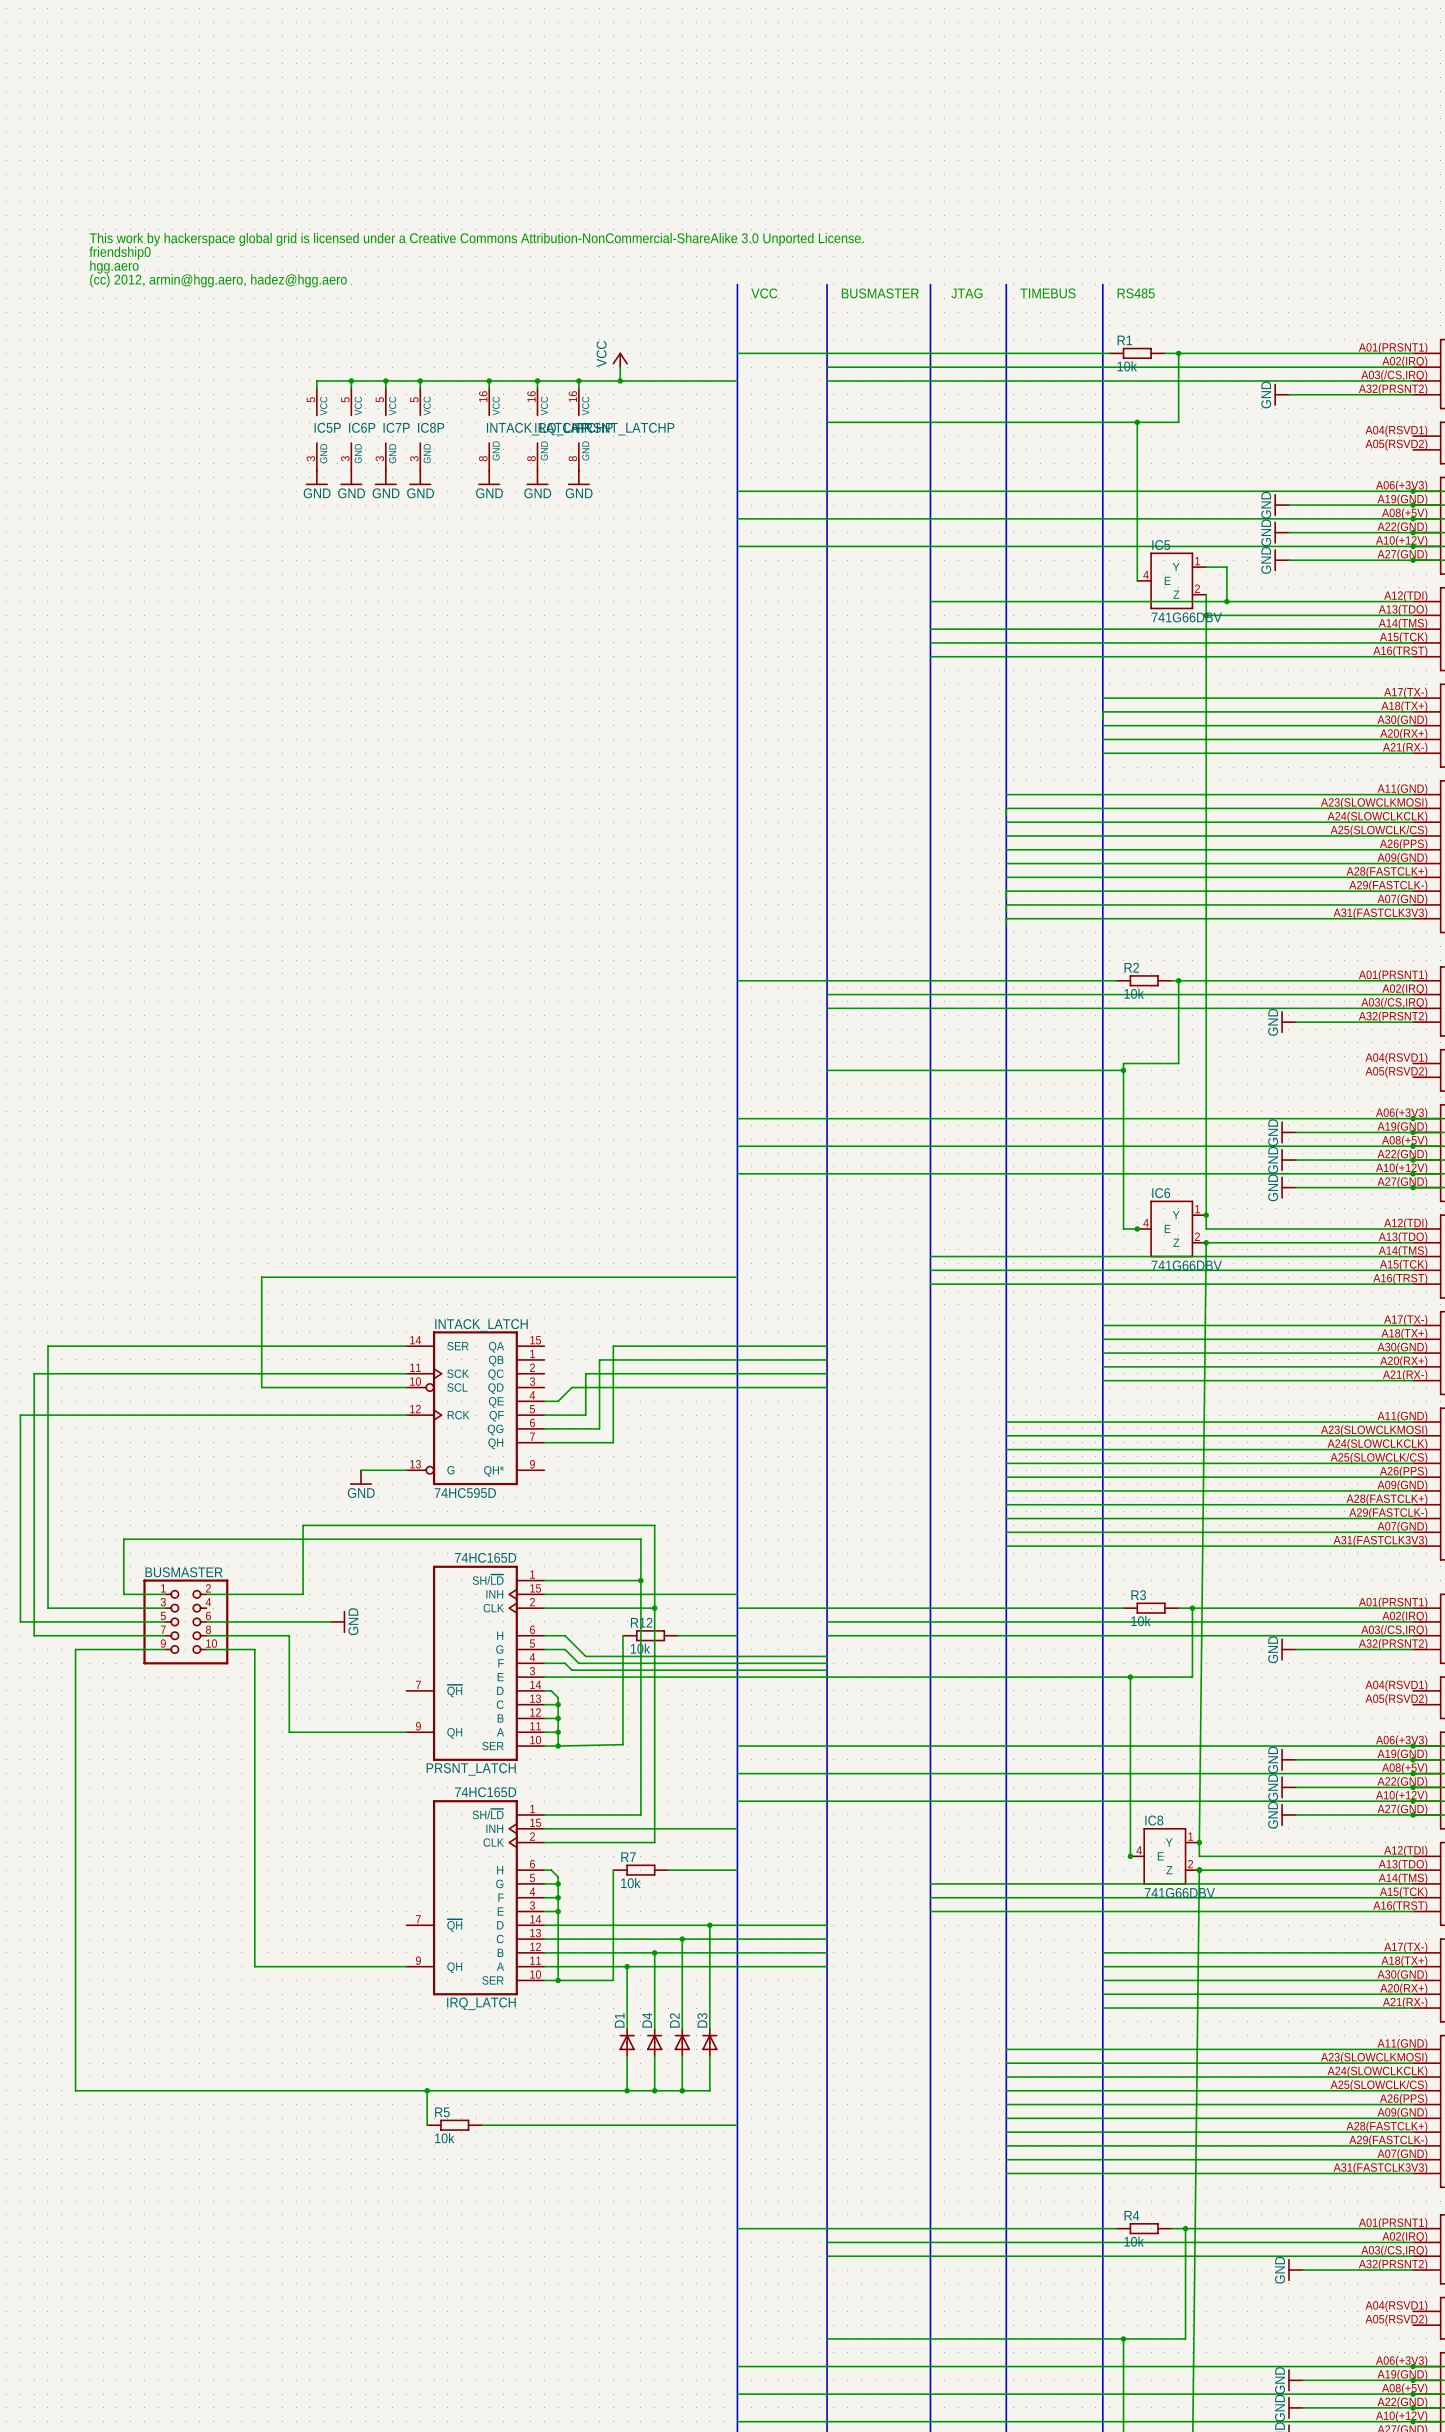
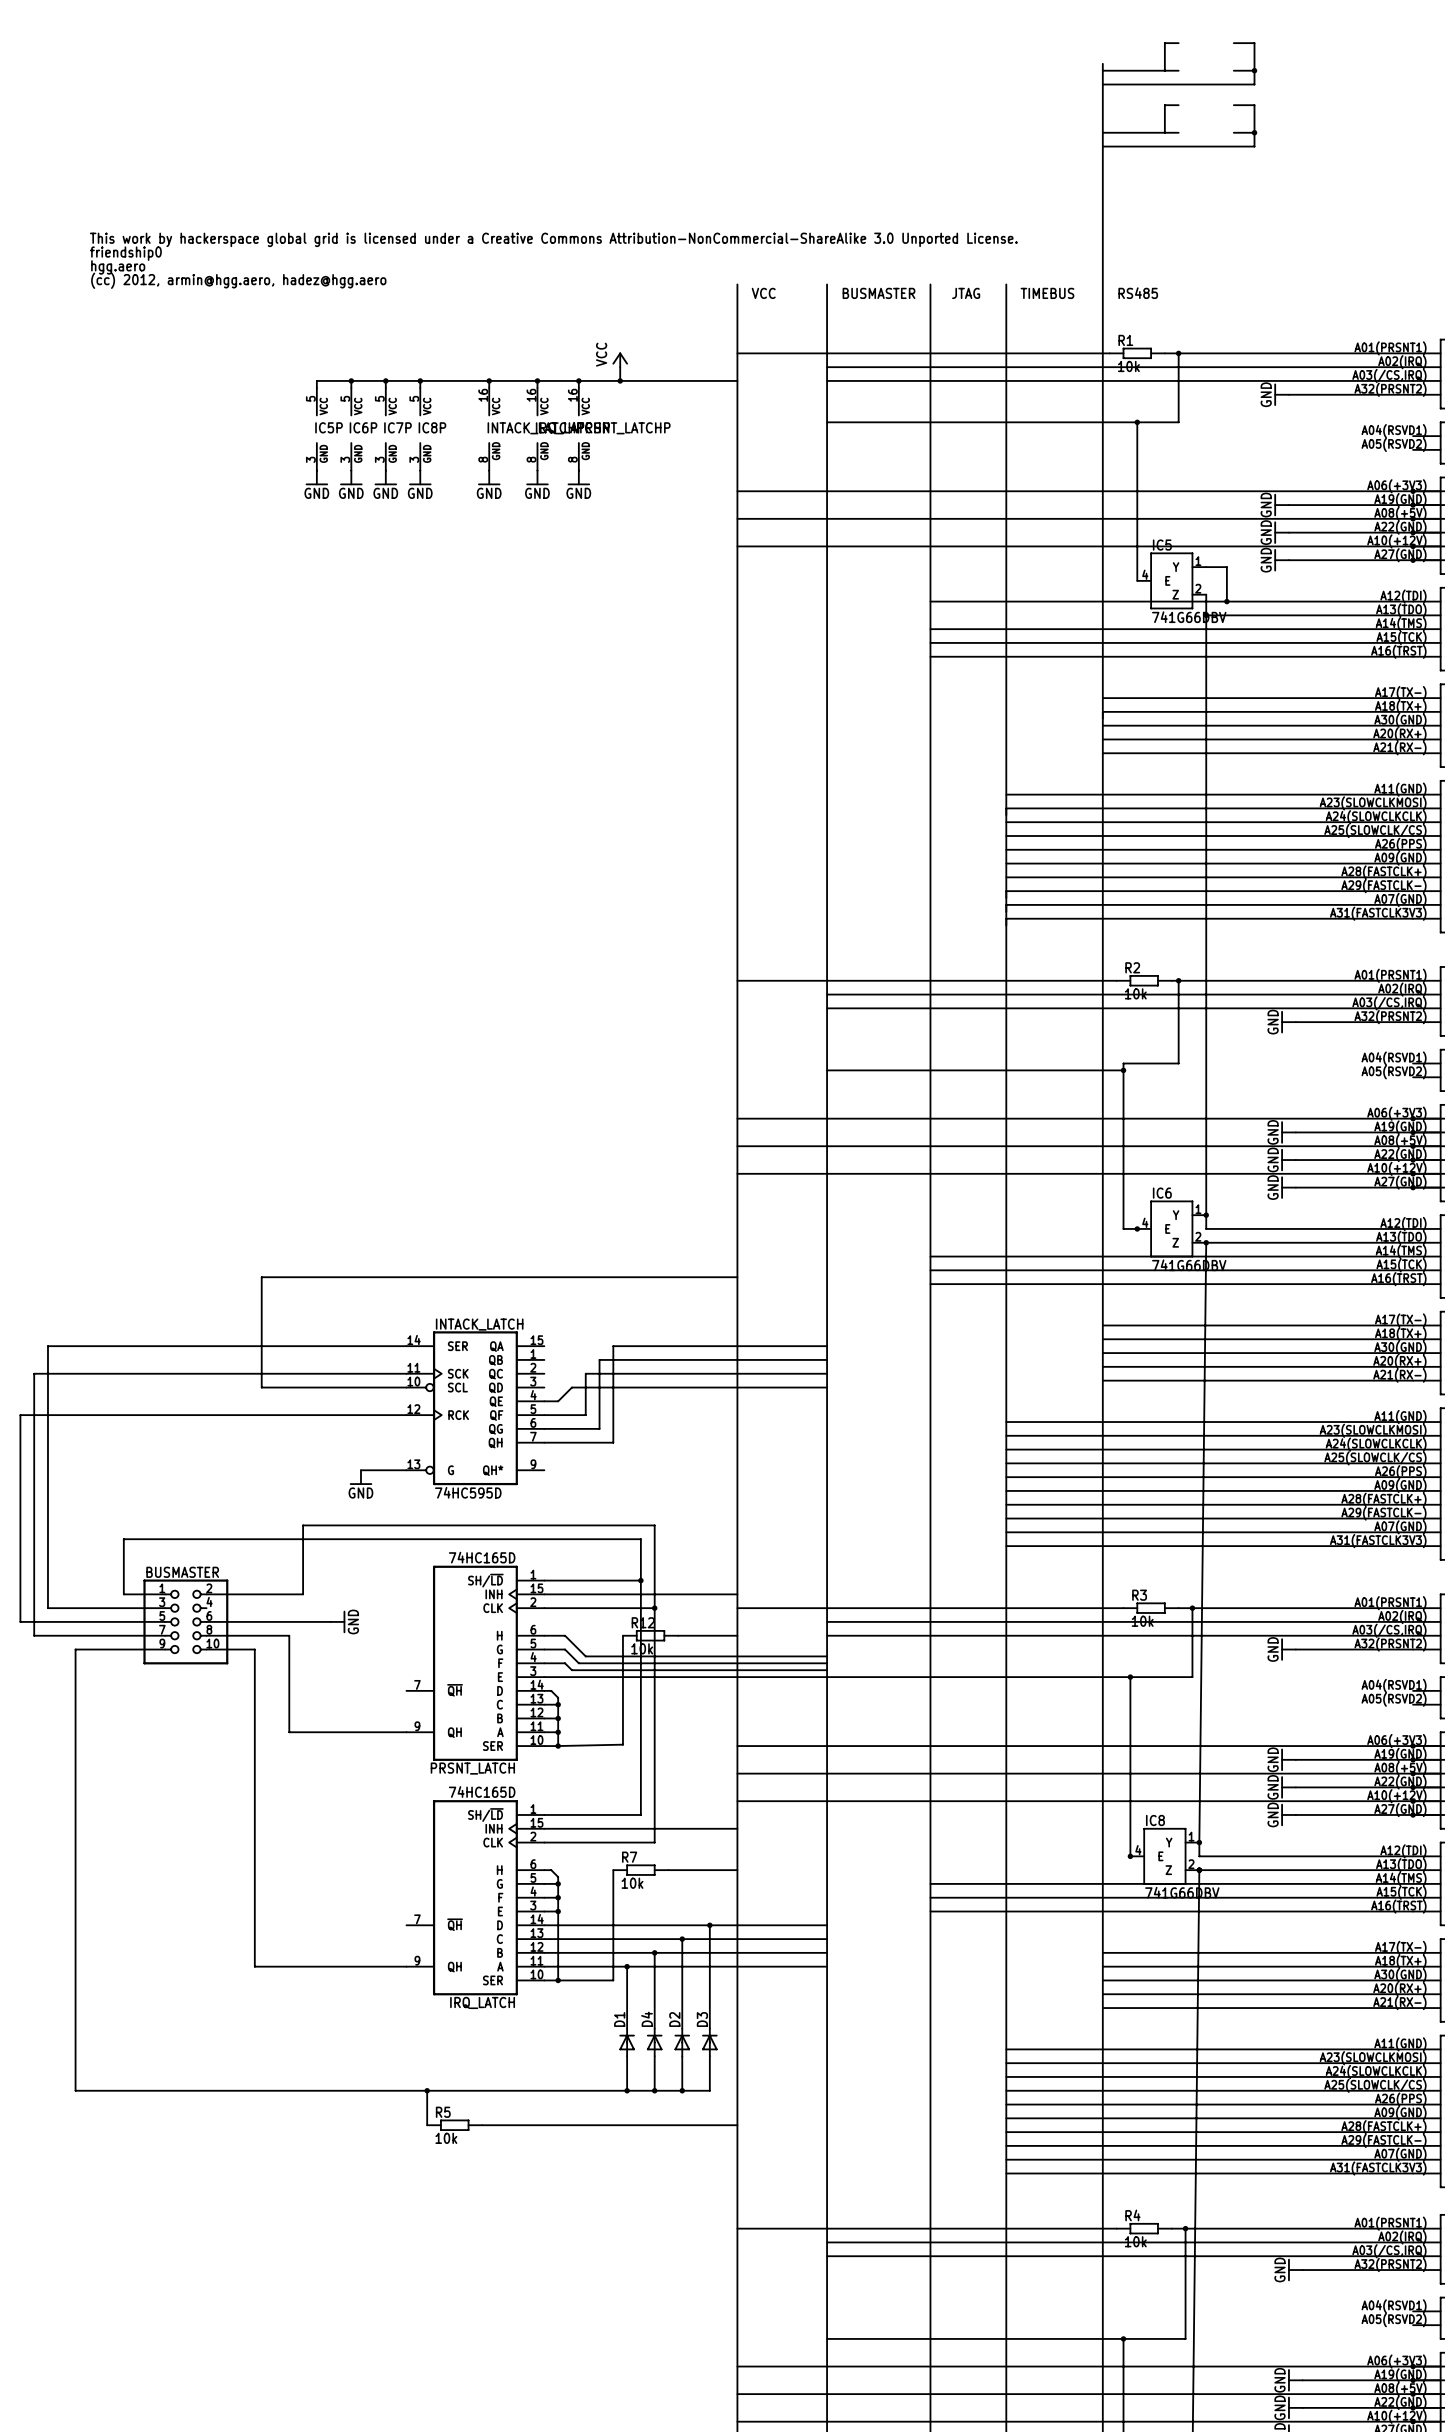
wire: none -> (1178, 43) (1164, 43) (1164, 70)
wire: none -> (1233, 43) (1254, 43) (1254, 84) (1102, 84)
bus: none -> (1102, 63) (1102, 284)
wire: none -> (1102, 70) (1178, 70)
wire: none -> (1233, 70) (1254, 70)
junction: none -> (1254, 70)
wire: none -> (1178, 105) (1164, 105) (1164, 132)
wire: none -> (1233, 105) (1254, 105) (1254, 146) (1102, 146)
wire: none -> (1102, 132) (1178, 132)
wire: none -> (1233, 132) (1254, 132)
junction: none -> (1254, 132)

